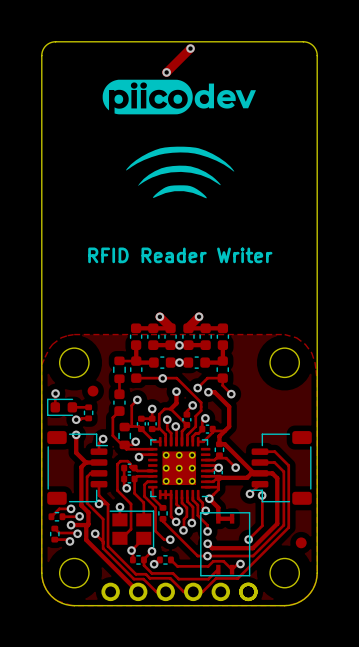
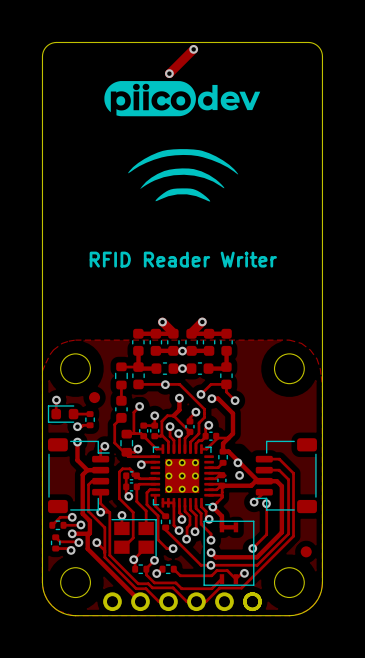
track: (216, 458) (226, 458) (235, 467) -> none
via position: (218, 467) -> (237, 462)

